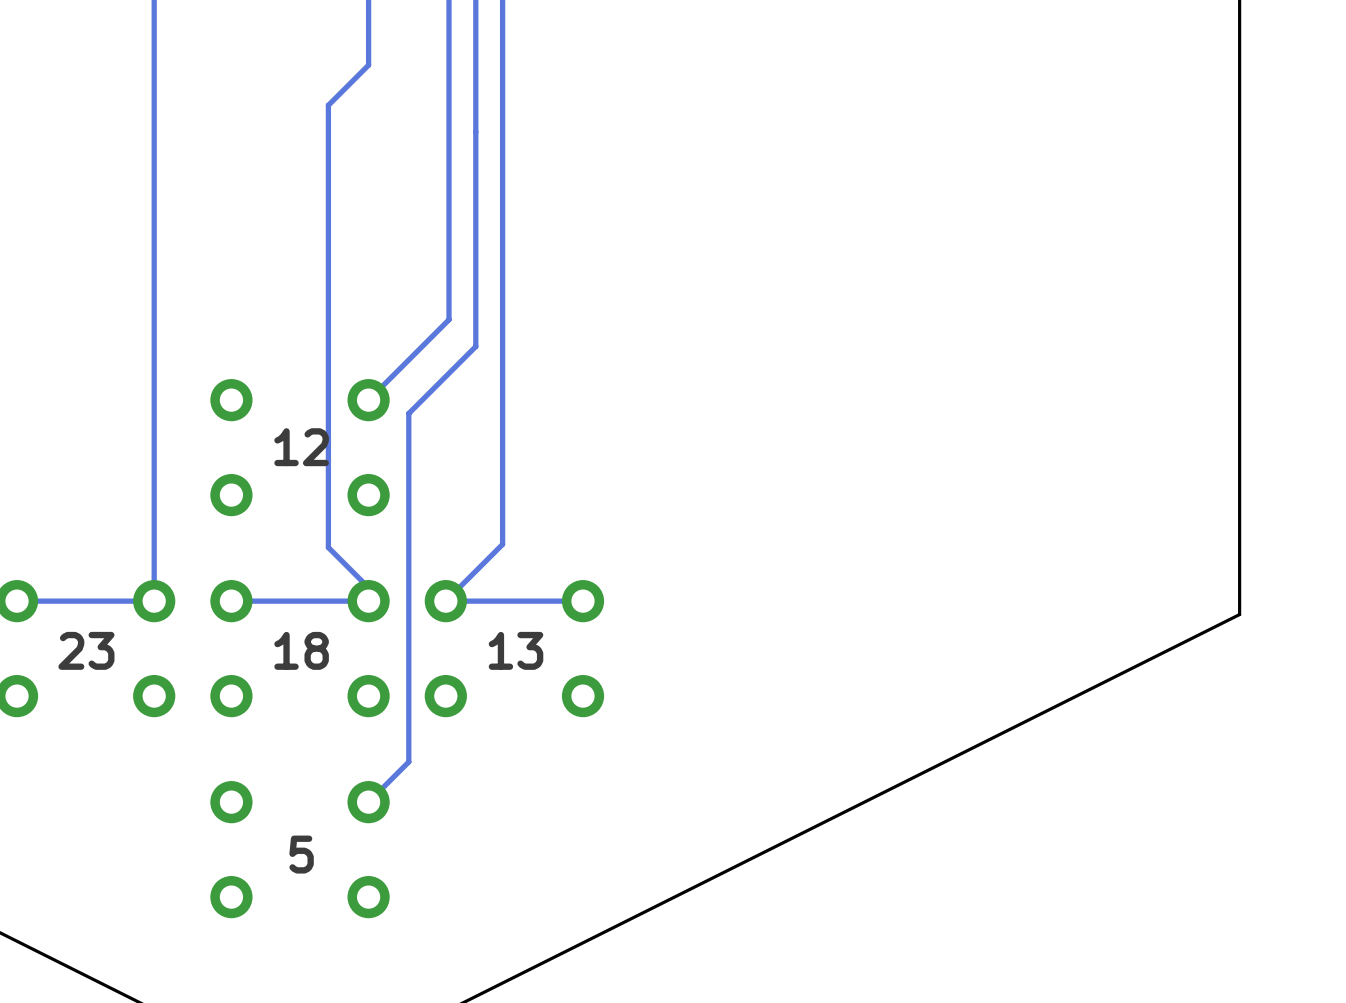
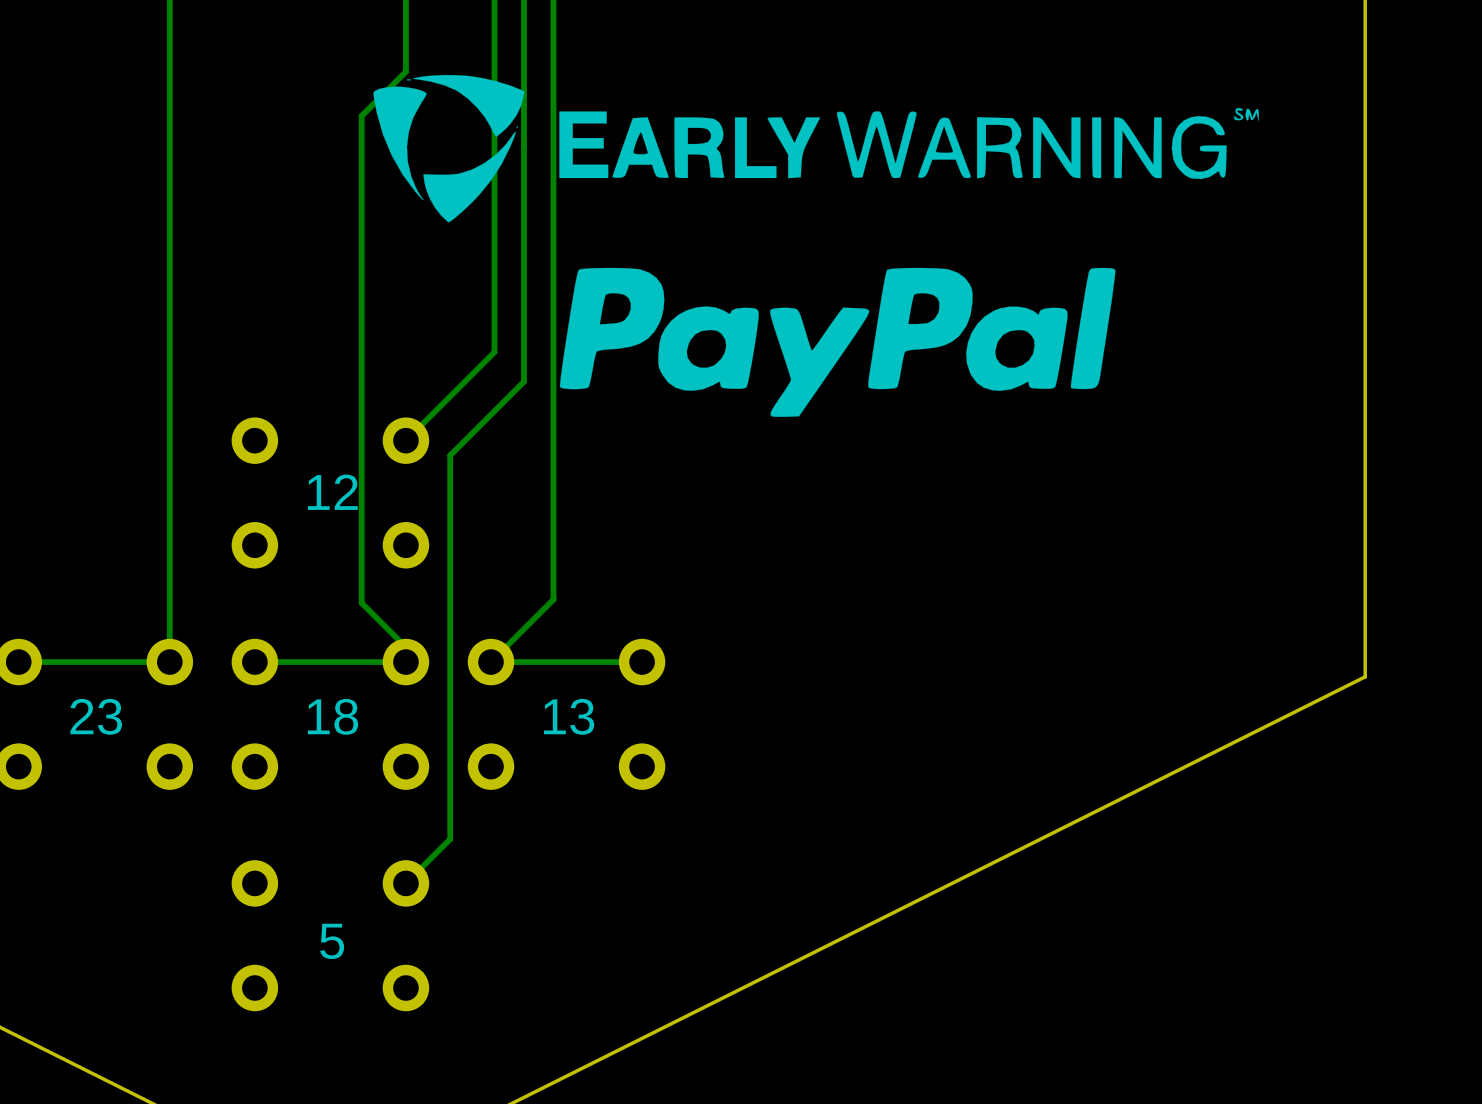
drawing: none -> [373, 75, 1259, 417]

